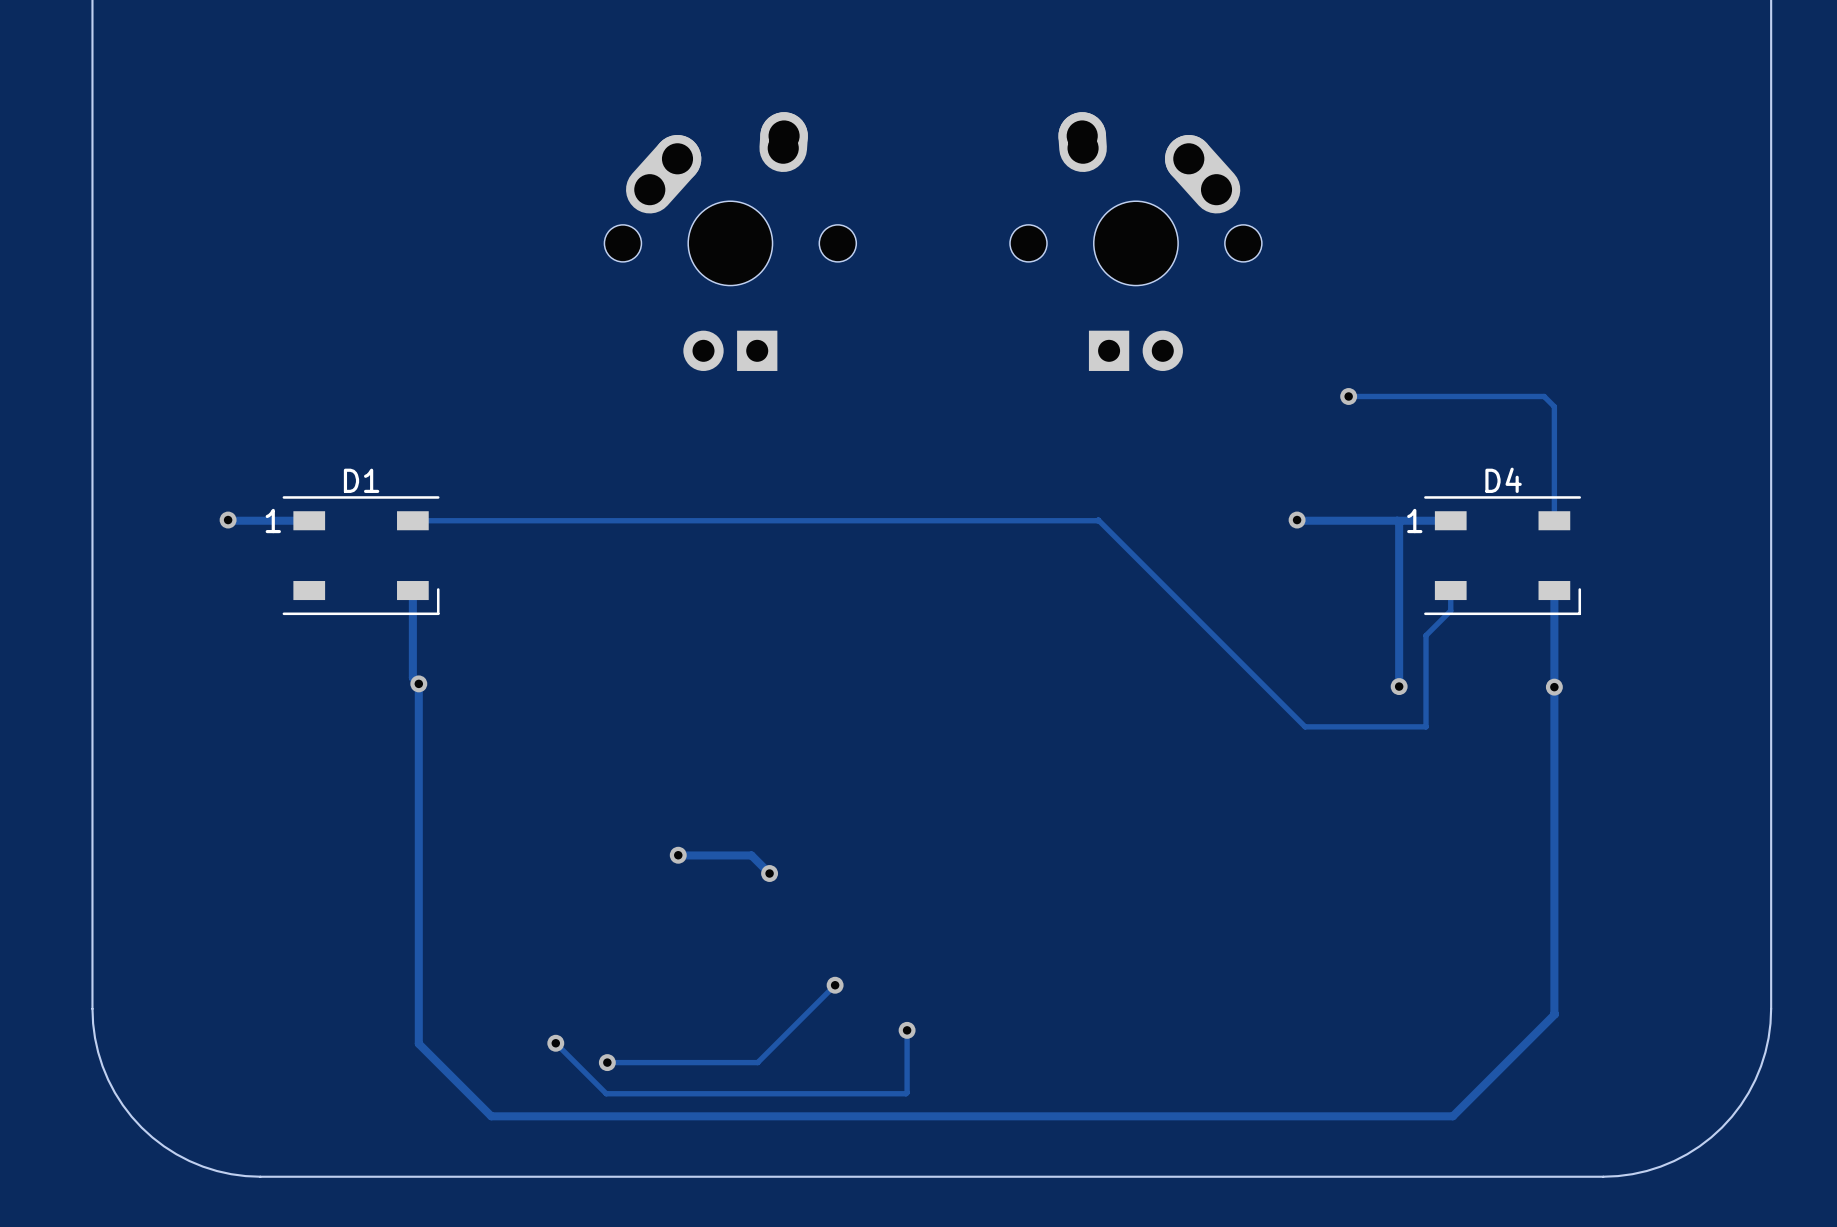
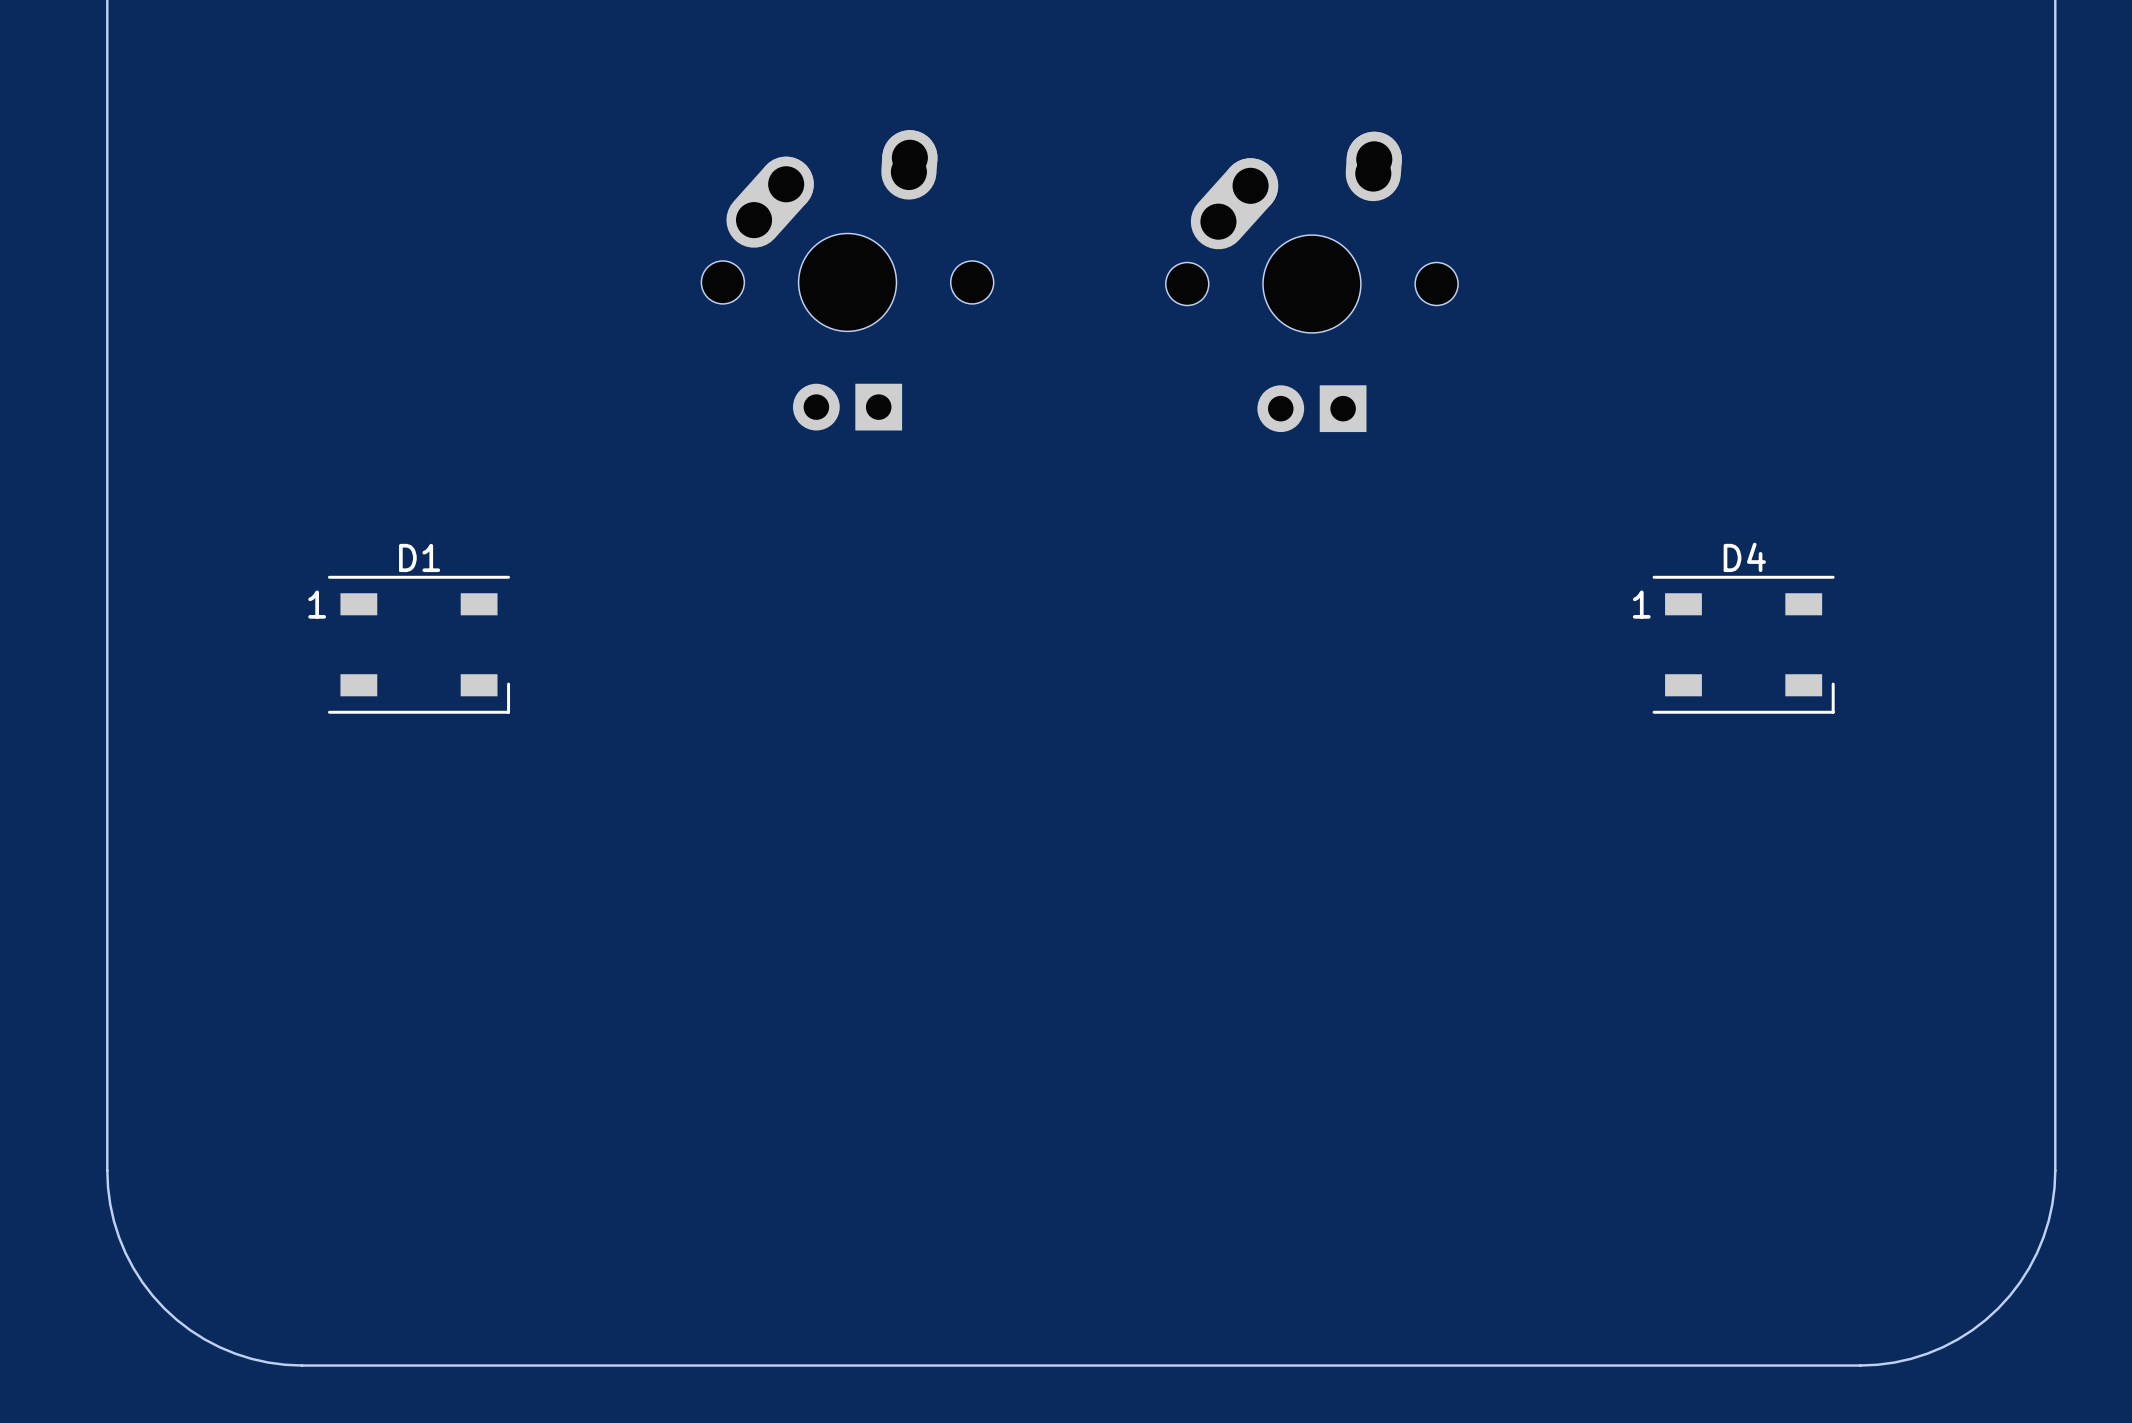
part side: top (1135, 241) -> bottom (1311, 281)
track: (1348, 396) (1544, 396) (1554, 406) (1554, 520) -> none
via: (1348, 396) -> none
track: (228, 520) (309, 520) -> none
via: (228, 520) -> none
track: (412, 520) (1098, 520) (1305, 726) (1426, 726) (1426, 635) (1450, 610) (1450, 590) -> none
track: (1297, 520) (1450, 520) -> none
via: (1297, 520) -> none
track: (1397, 520) (1399, 522) (1399, 686) -> none
track: (1554, 590) (1554, 1014) (1452, 1116) (491, 1116) (418, 1043) (418, 683) (412, 677) (412, 590) -> none
via: (418, 683) -> none
via: (1399, 686) -> none
via: (1554, 687) -> none
via: (678, 855) -> none
track: (679, 855) (751, 855) (769, 873) -> none
via: (769, 873) -> none
track: (835, 985) (757, 1062) (607, 1062) -> none
via: (835, 985) -> none
track: (907, 1030) (906, 1093) (606, 1093) (555, 1043) -> none
via: (907, 1030) -> none
via: (555, 1043) -> none
via: (607, 1062) -> none

